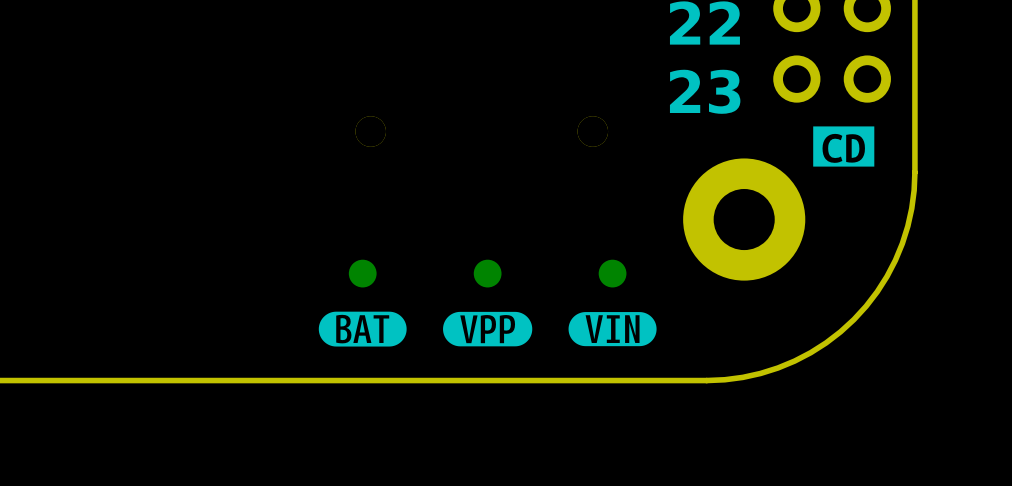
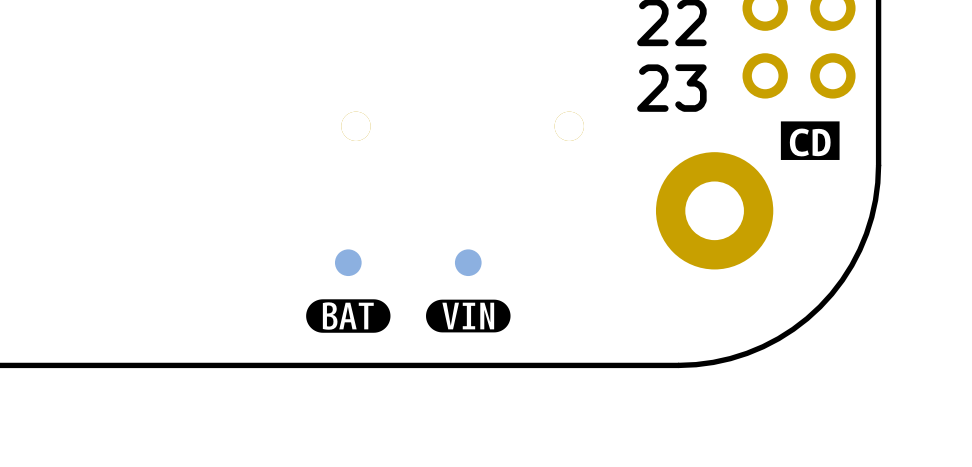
part: (612, 273) -> none
drawing: [443, 311, 533, 347] -> none
drawing position: (612, 329) -> (468, 316)

